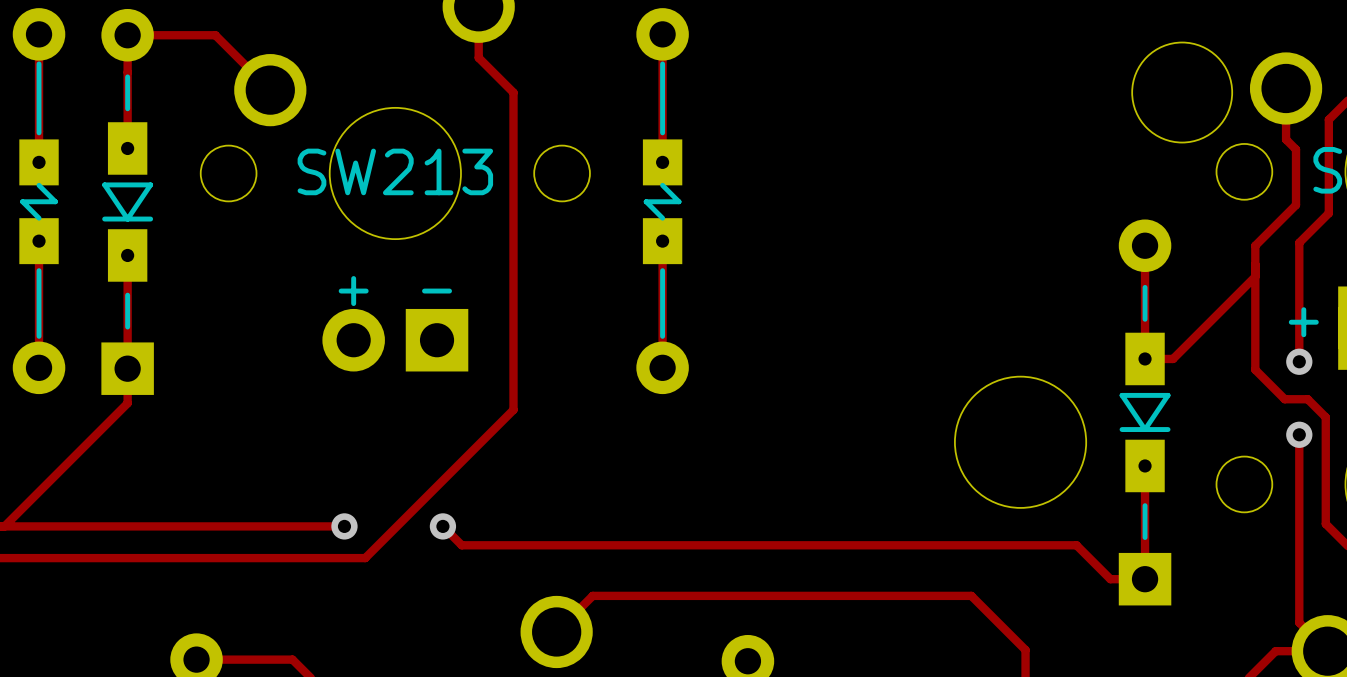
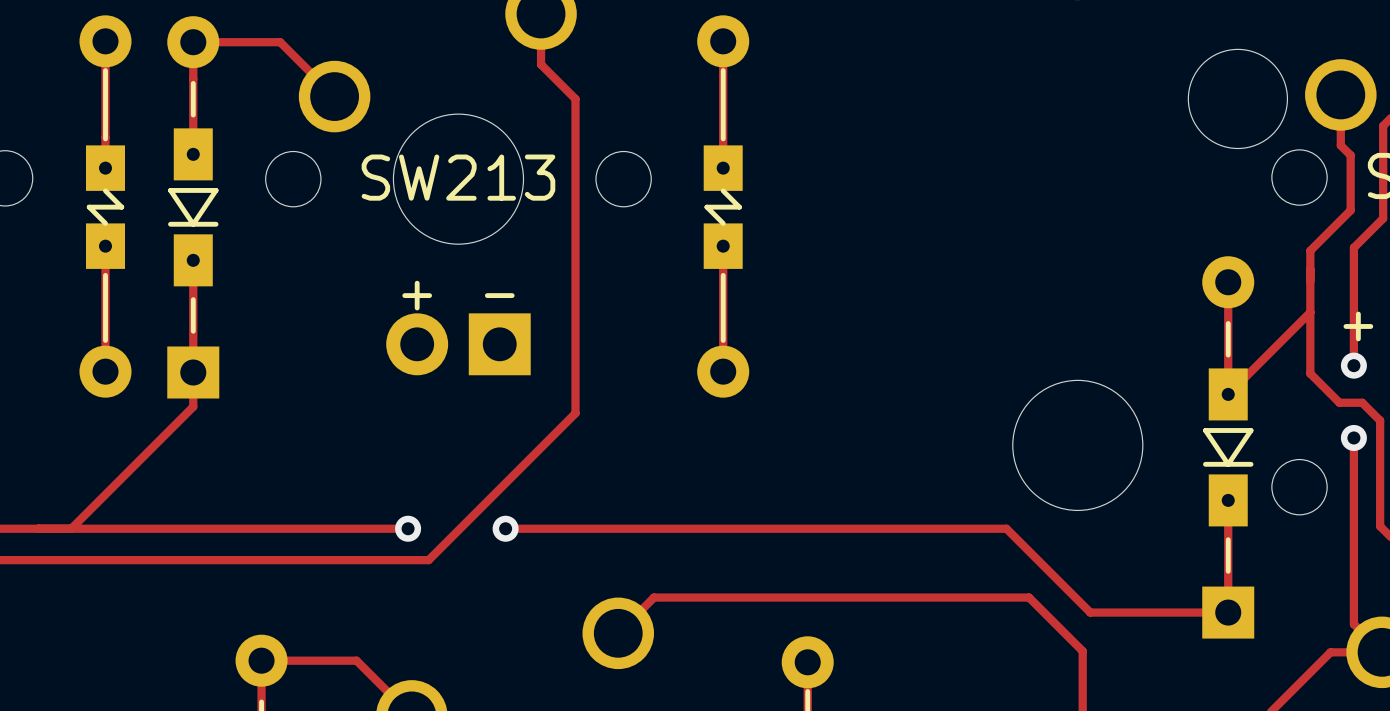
track: (1145, 245) (1145, 358) (1173, 358) (1255, 276) -> none
track: none -> (1228, 282) (1228, 394) (1310, 312)
part position: (1145, 412) -> (1228, 447)
track: (1145, 465) (1145, 579) (1110, 579) (1076, 545) (461, 545) (442, 526) -> (1228, 500) (1228, 612) (1090, 612) (1006, 528) (505, 528)

